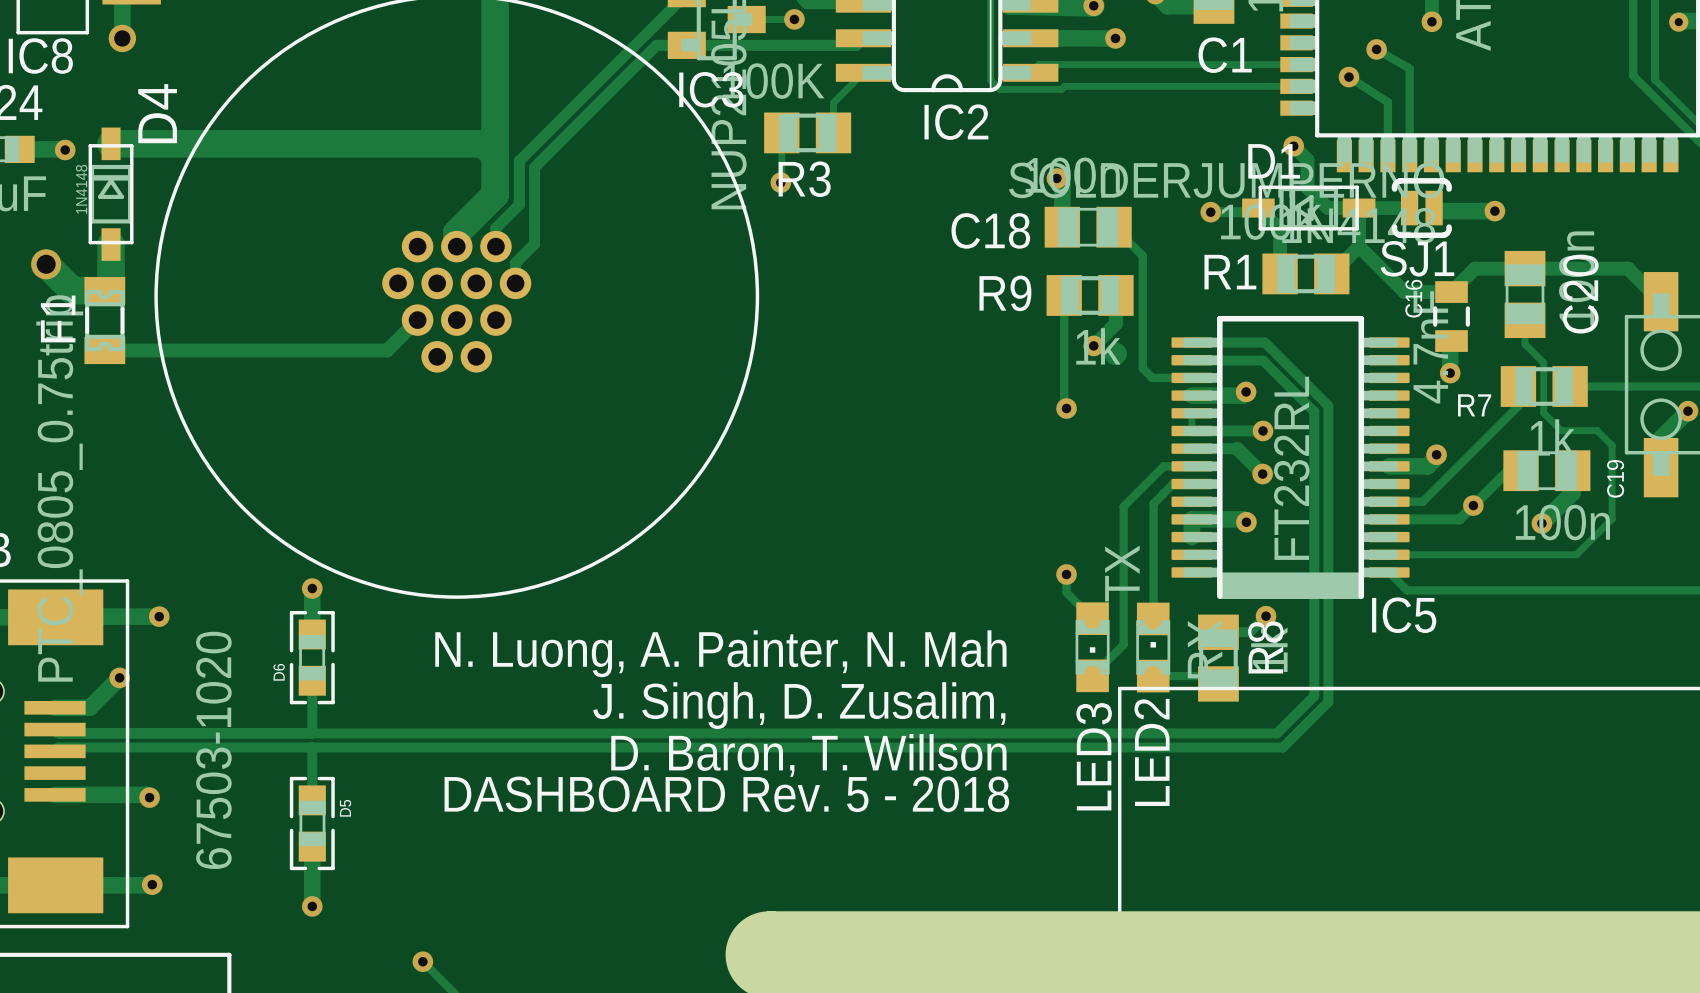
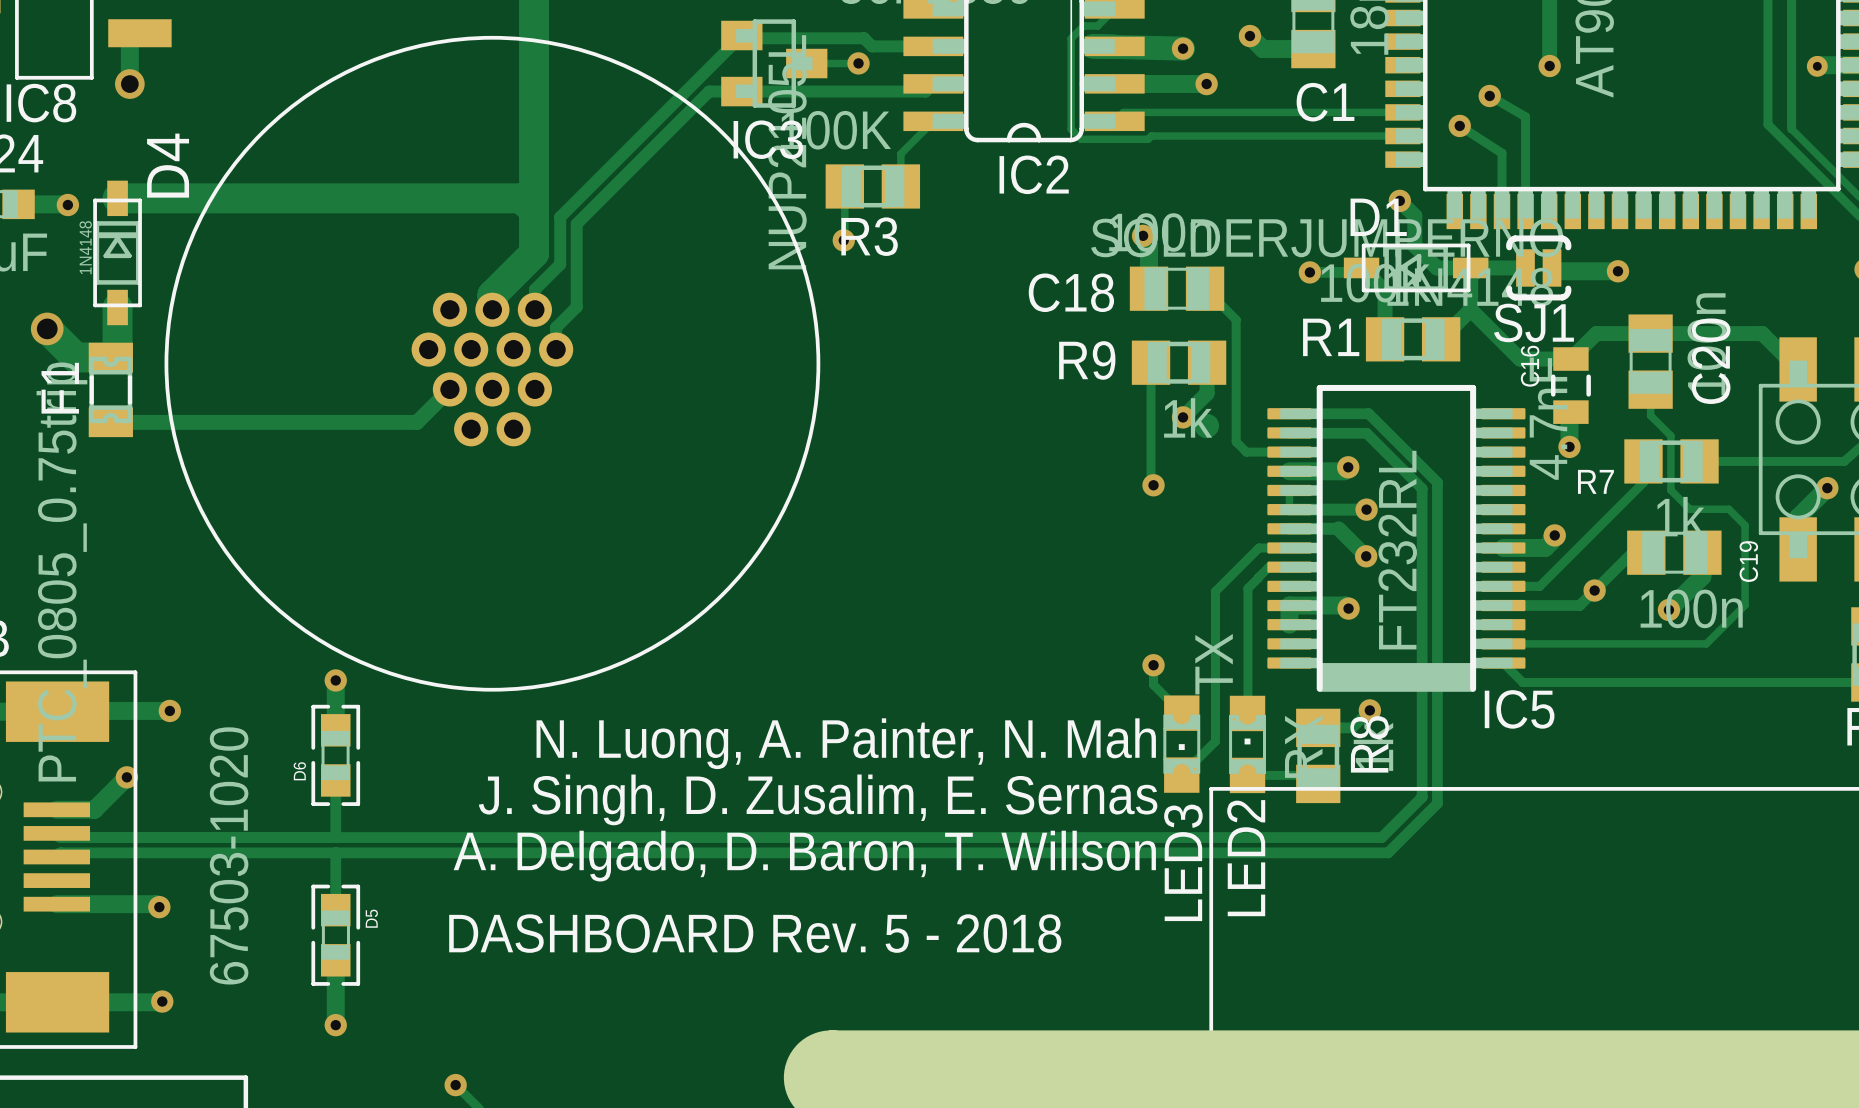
text position: N. Luong, A. Painter, N. Mah (720, 653) -> N. Luong, A. Painter, N. Mah (846, 743)
text: J. Singh, D. Zusalim, (799, 705) -> J. Singh, D. Zusalim, E. Sernas (818, 799)
text: D. Baron, T. Willson (808, 755) -> A. Delgado, D. Baron, T. Willson (804, 856)
text position: DASHBOARD Rev. 5 - 2018 (726, 794) -> DASHBOARD Rev. 5 - 2018 (755, 933)

